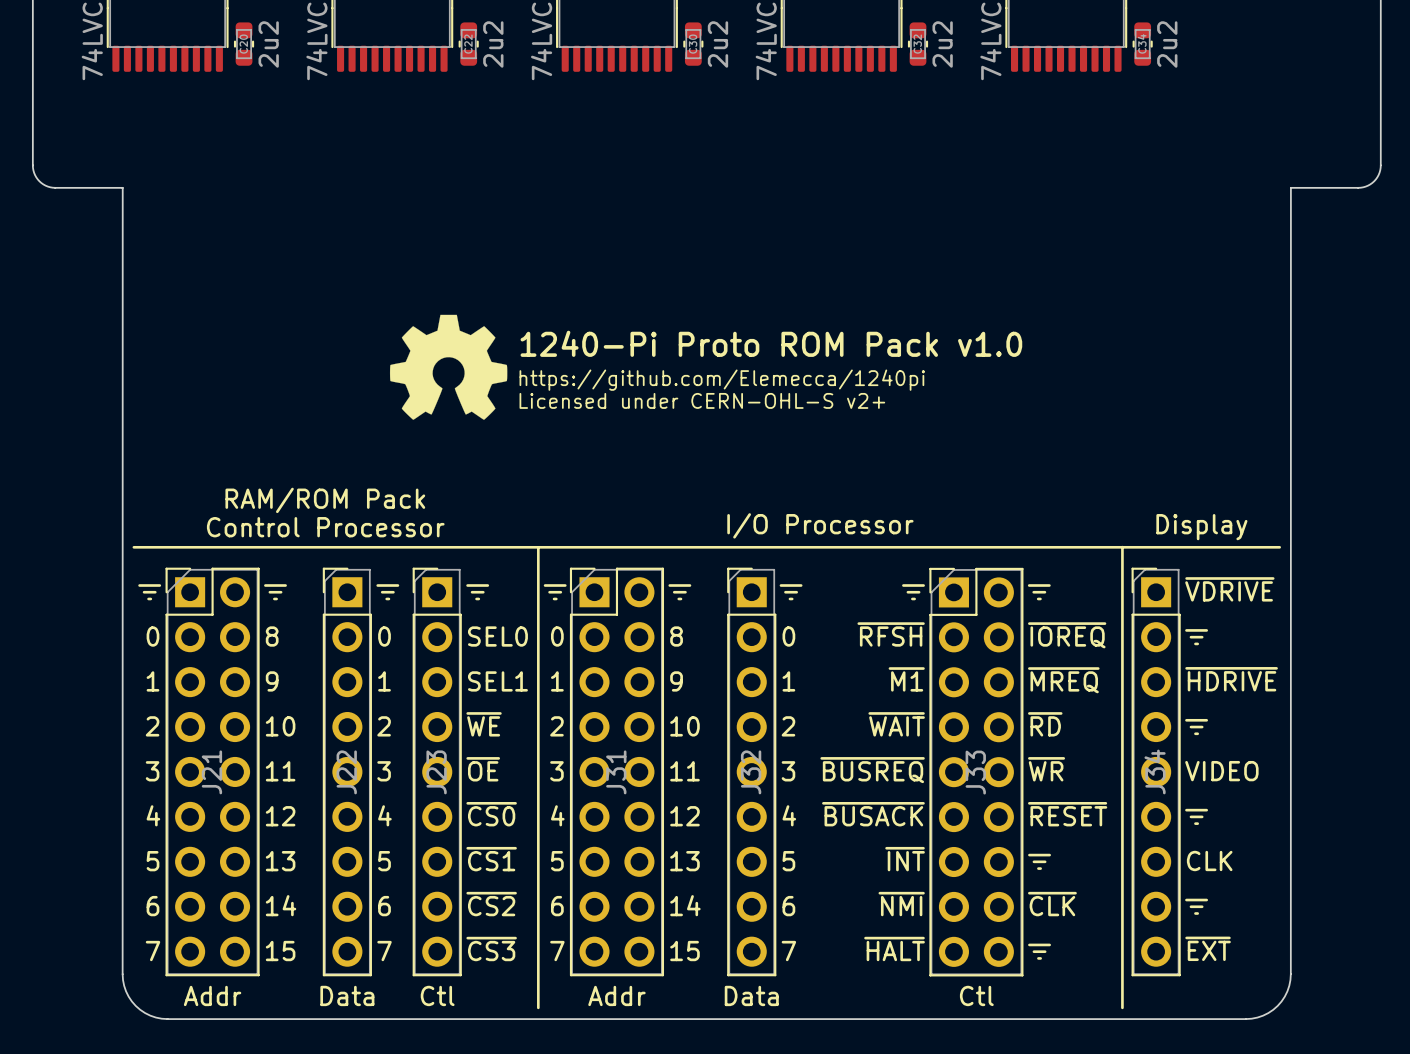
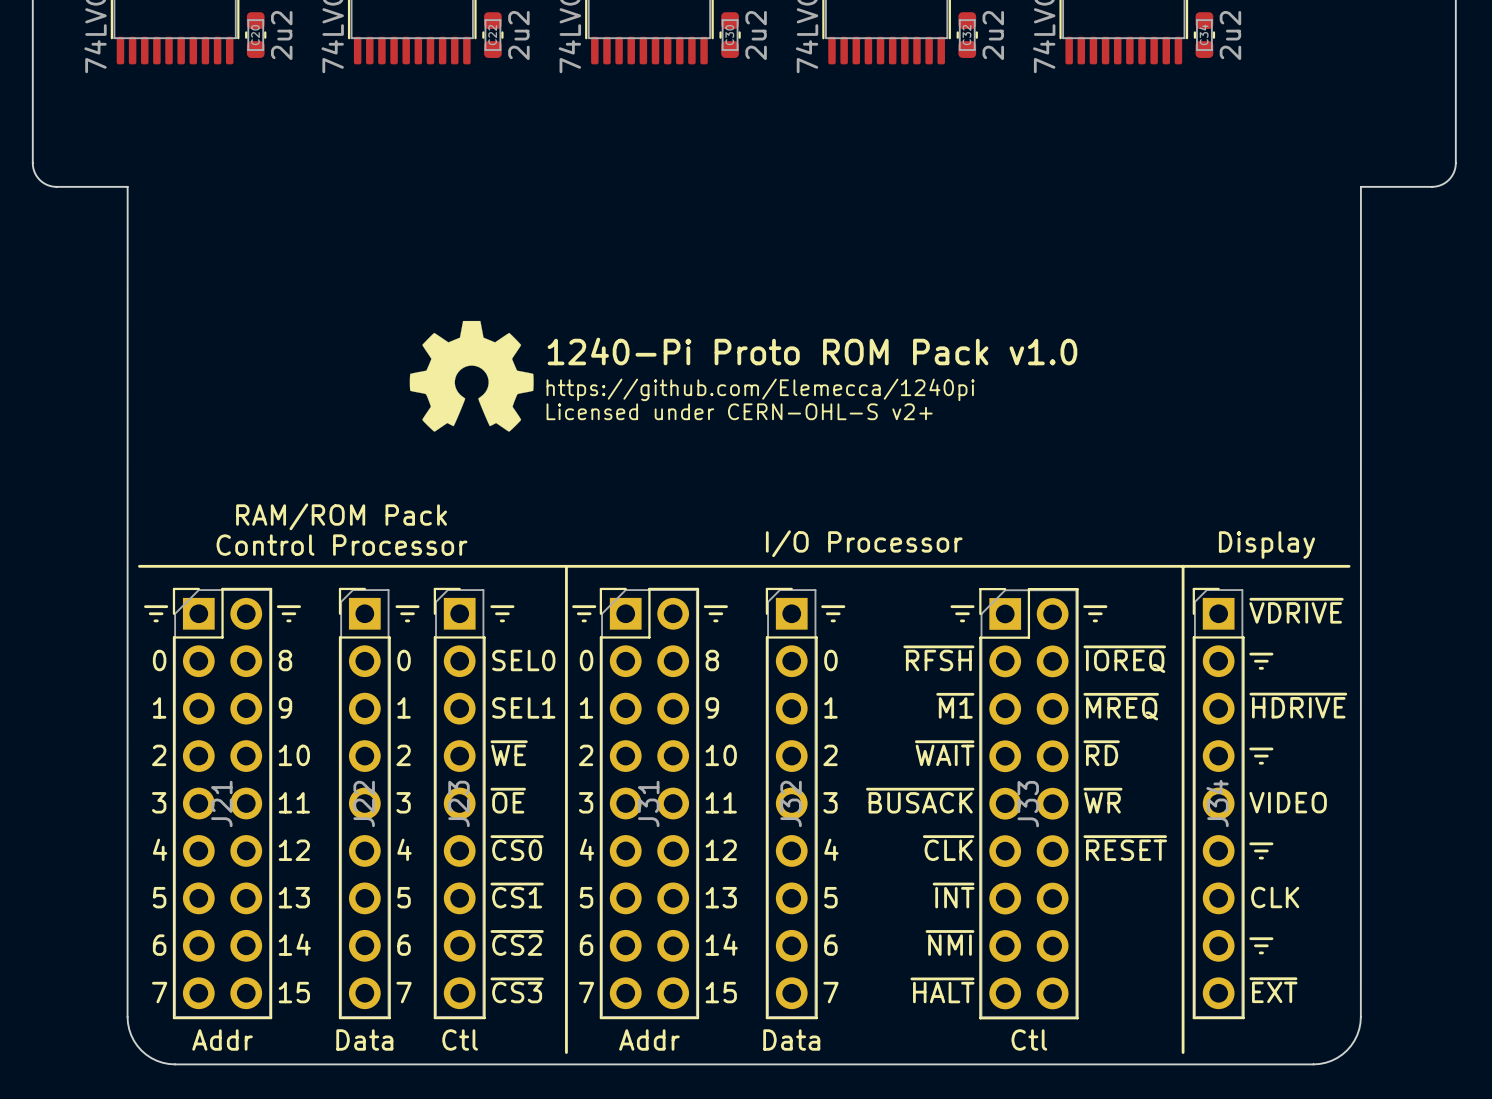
text: ~{BUSREQ} (872, 770) -> ~{BUSACK} (920, 800)
text: ~{BUSACK} (873, 814) -> ~{CLK} (948, 848)
line: (1029, 855) (1049, 855) -> none
line: (1033, 861) (1045, 861) -> none
line: (1038, 868) (1040, 868) -> none
text: ~{CLK} (1052, 904) -> none
line: (1029, 944) (1049, 944) -> none
line: (1033, 951) (1045, 951) -> none
line: (1038, 958) (1040, 958) -> none

